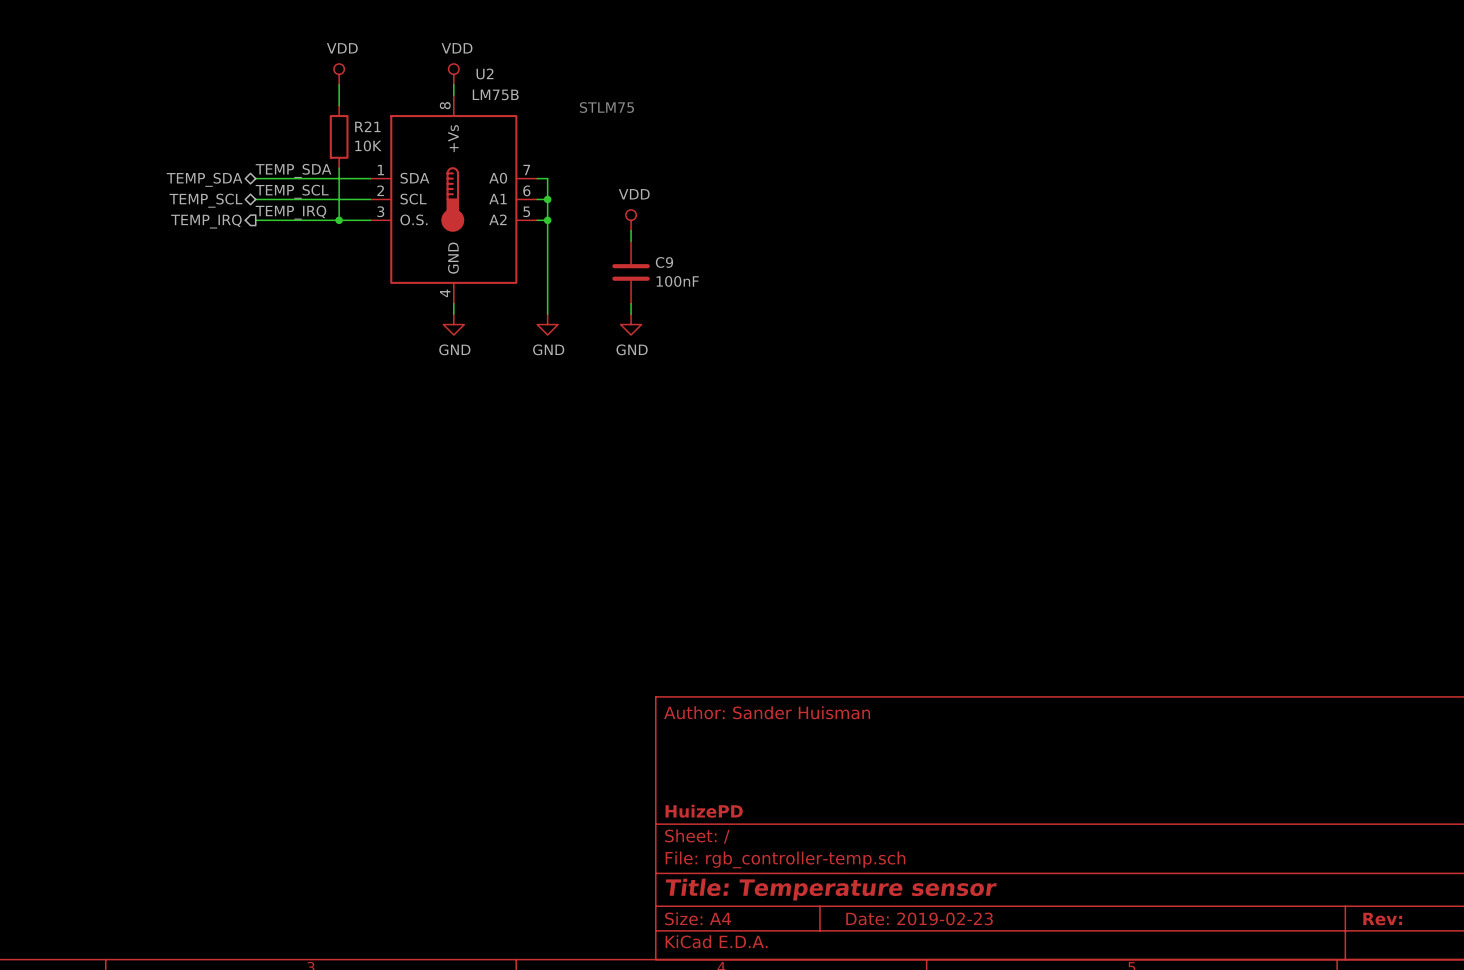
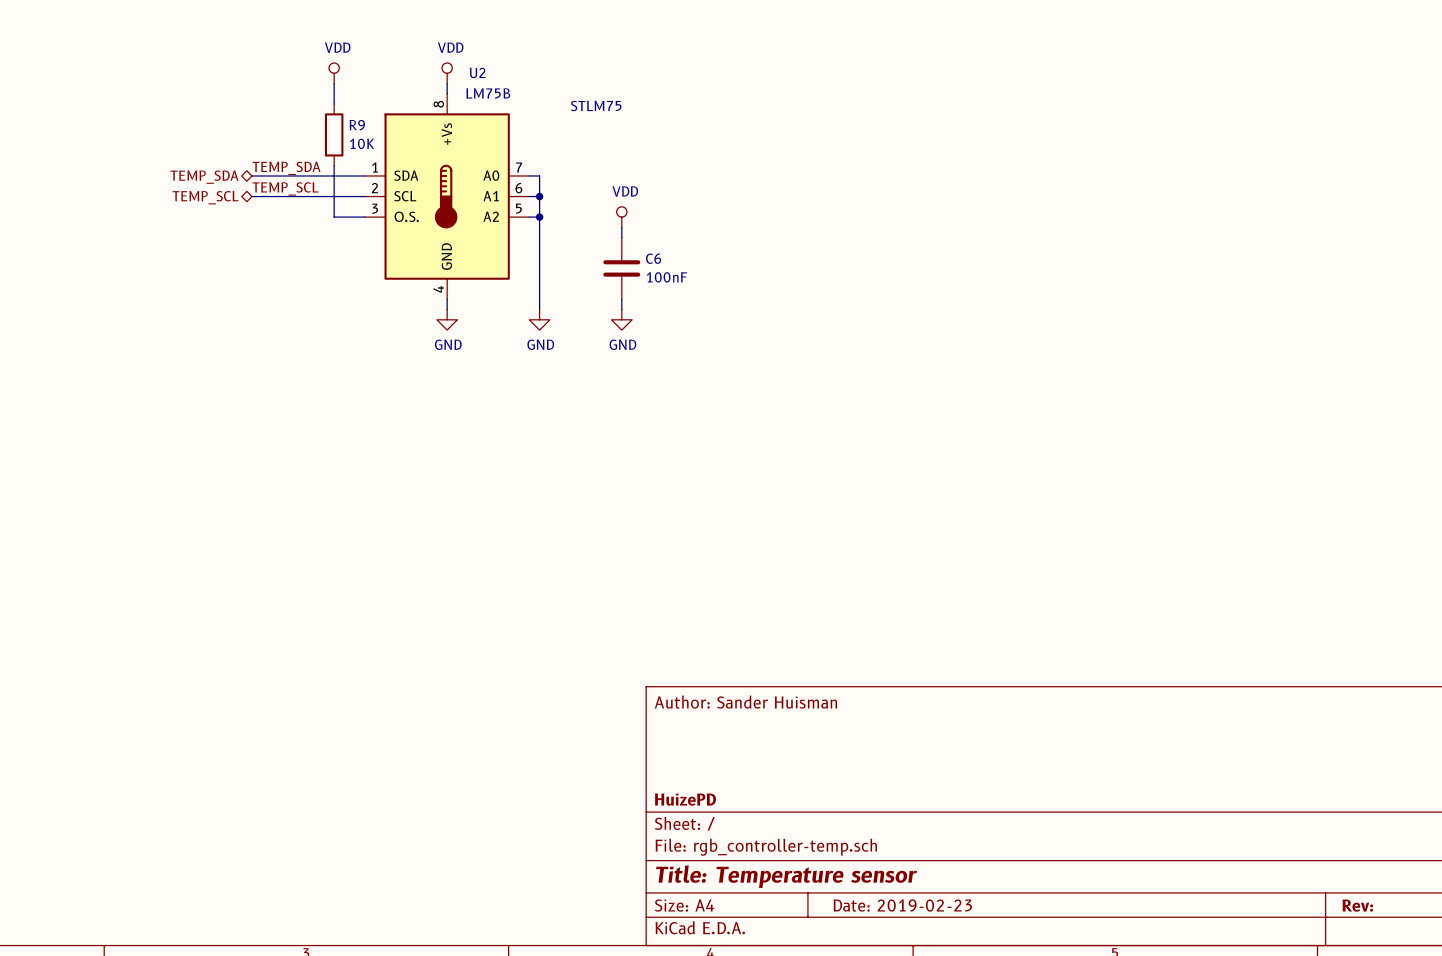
R21 name: R21 (367, 126) -> R9 (357, 125)
label: TEMP_IRQ (290, 212) -> none
wire: (255, 220) (339, 220) -> none
junction: (339, 220) -> none
hierarchical label: TEMP_IRQ (206, 221) -> none
C9 name: C9 (664, 262) -> C6 (653, 258)

